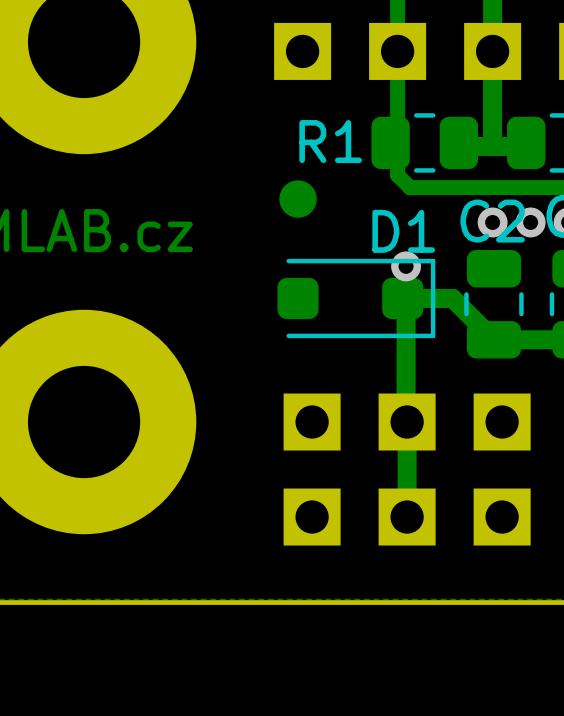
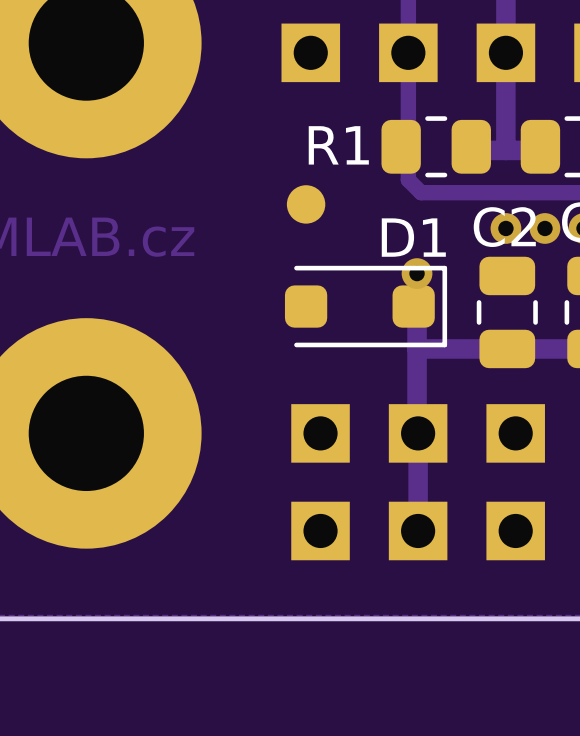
track: (406, 298) (452, 298) (493, 339) -> (417, 348) (507, 348)

